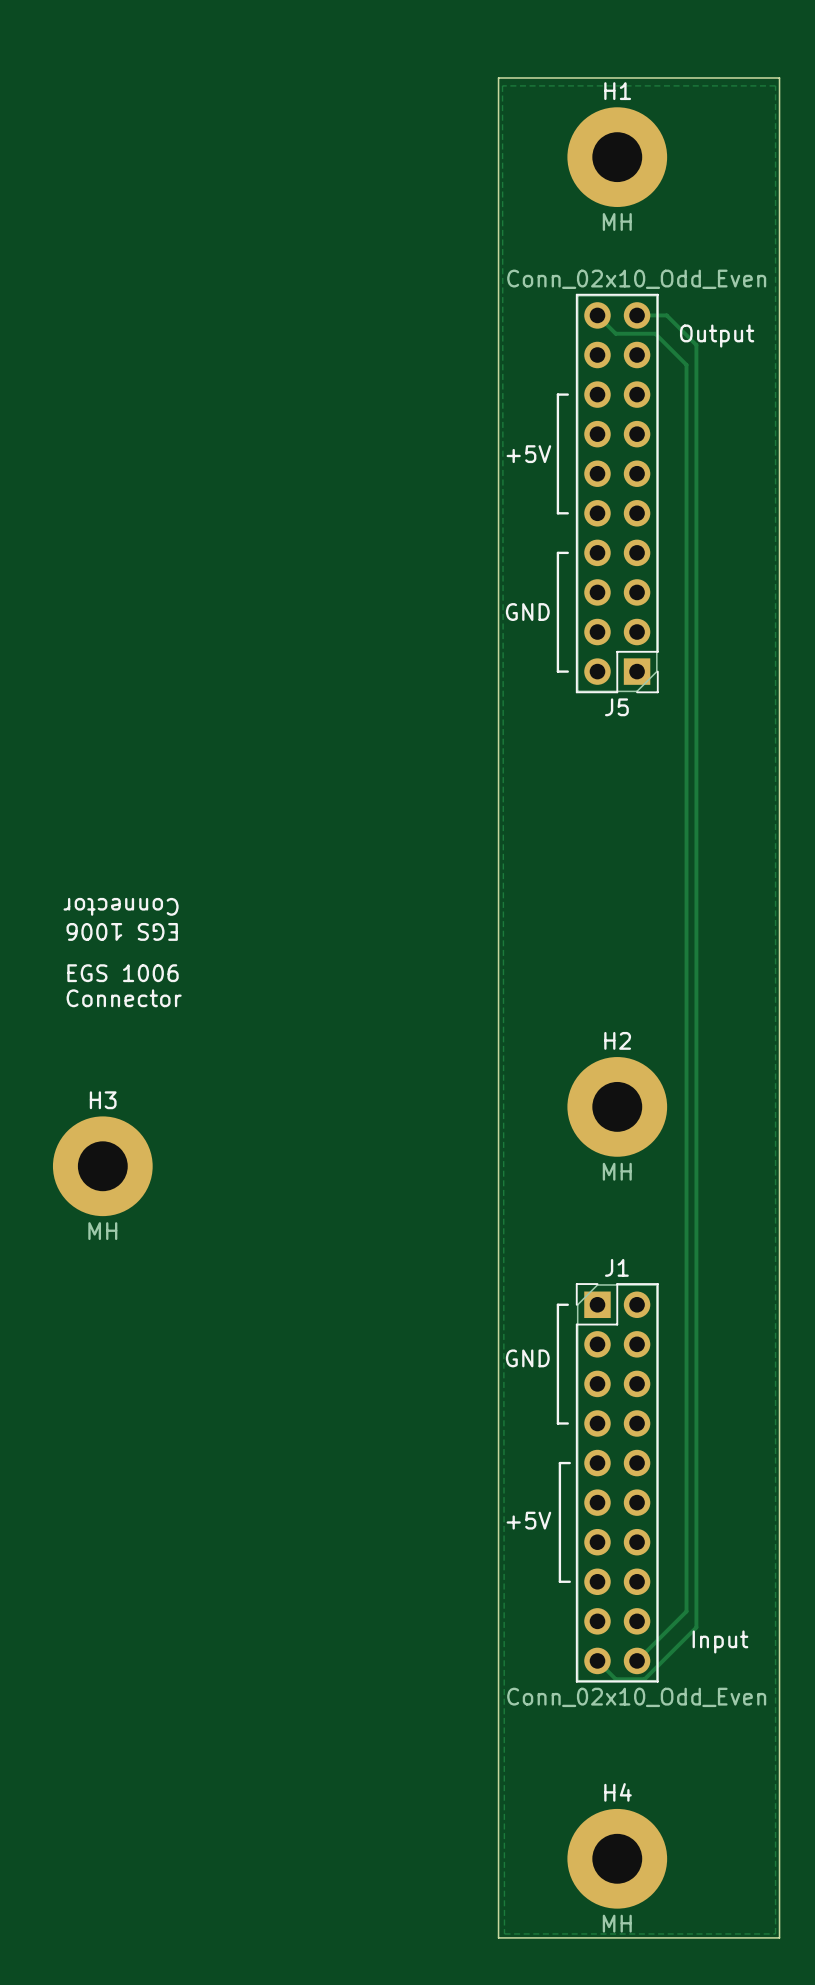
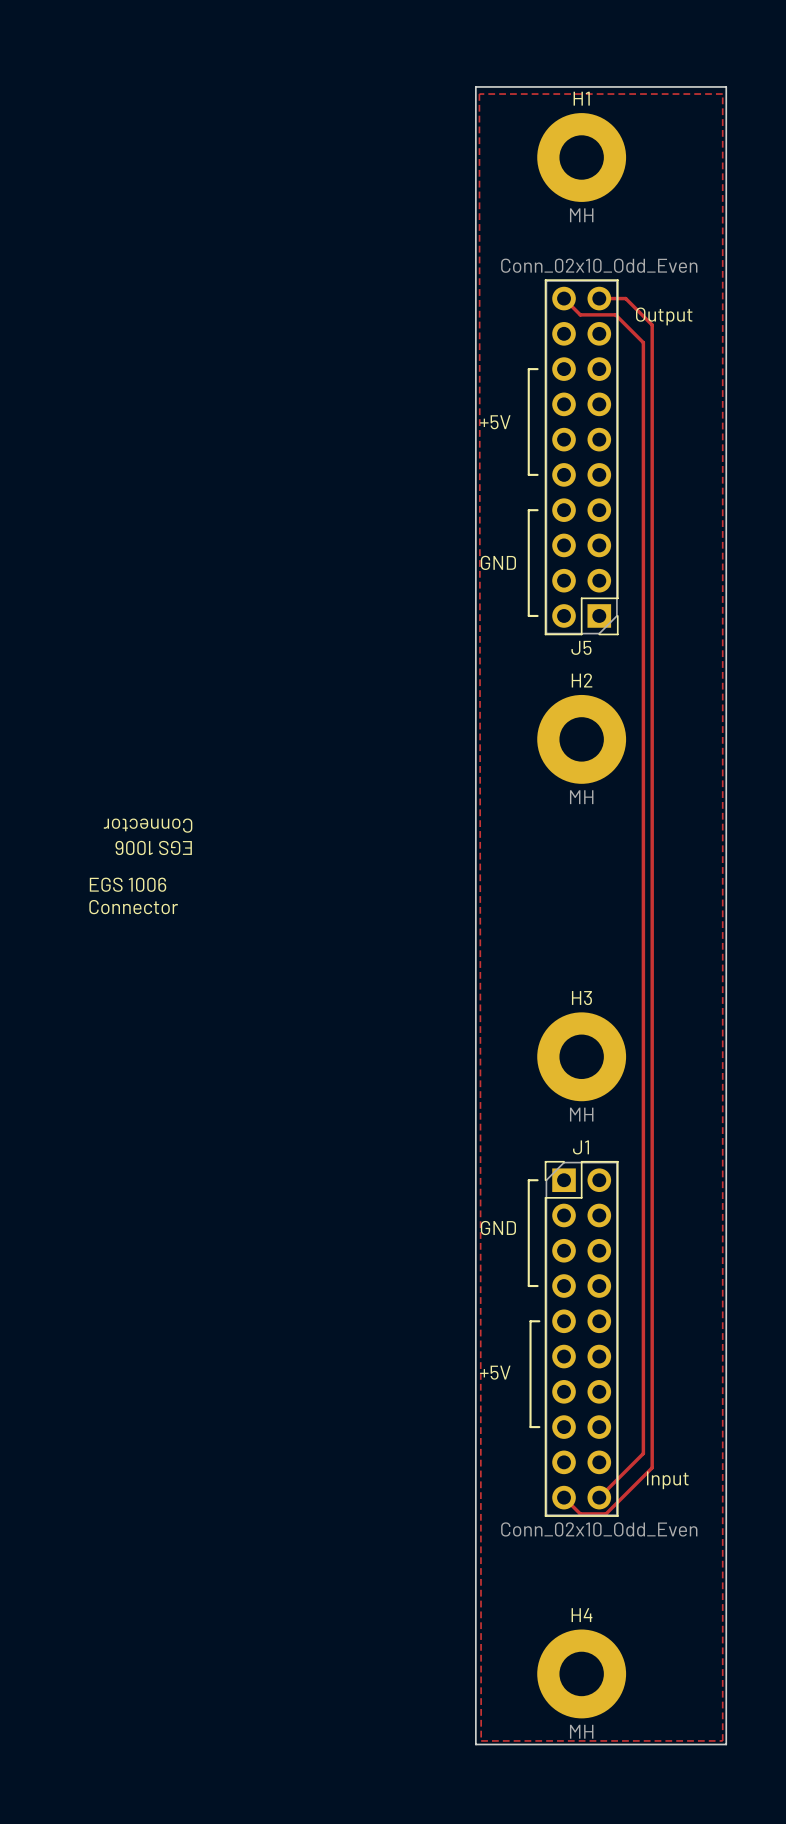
H2 position: (617, 1106) -> (581, 739)
H3 position: (102, 1166) -> (581, 1056)

